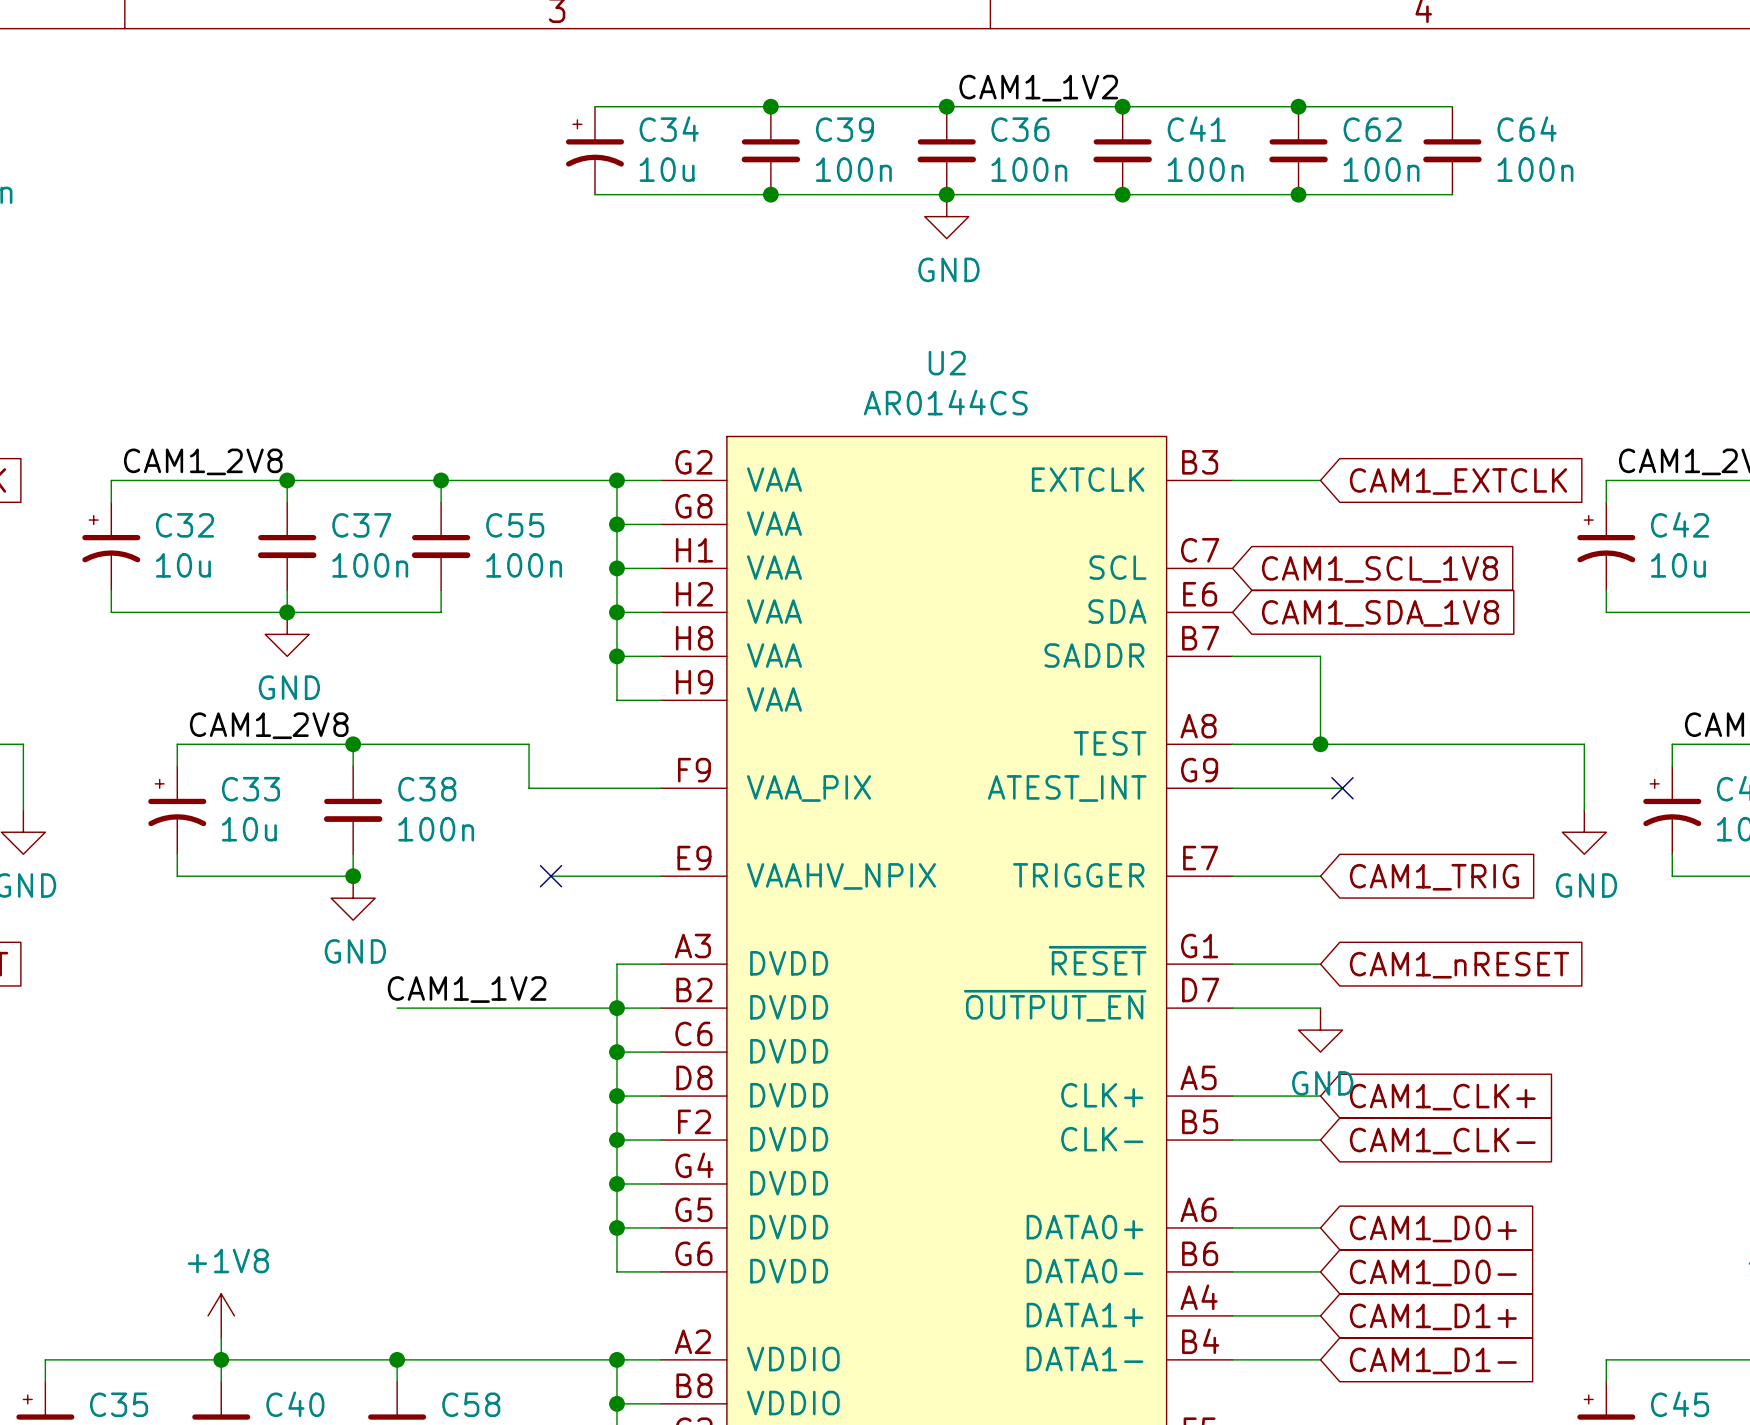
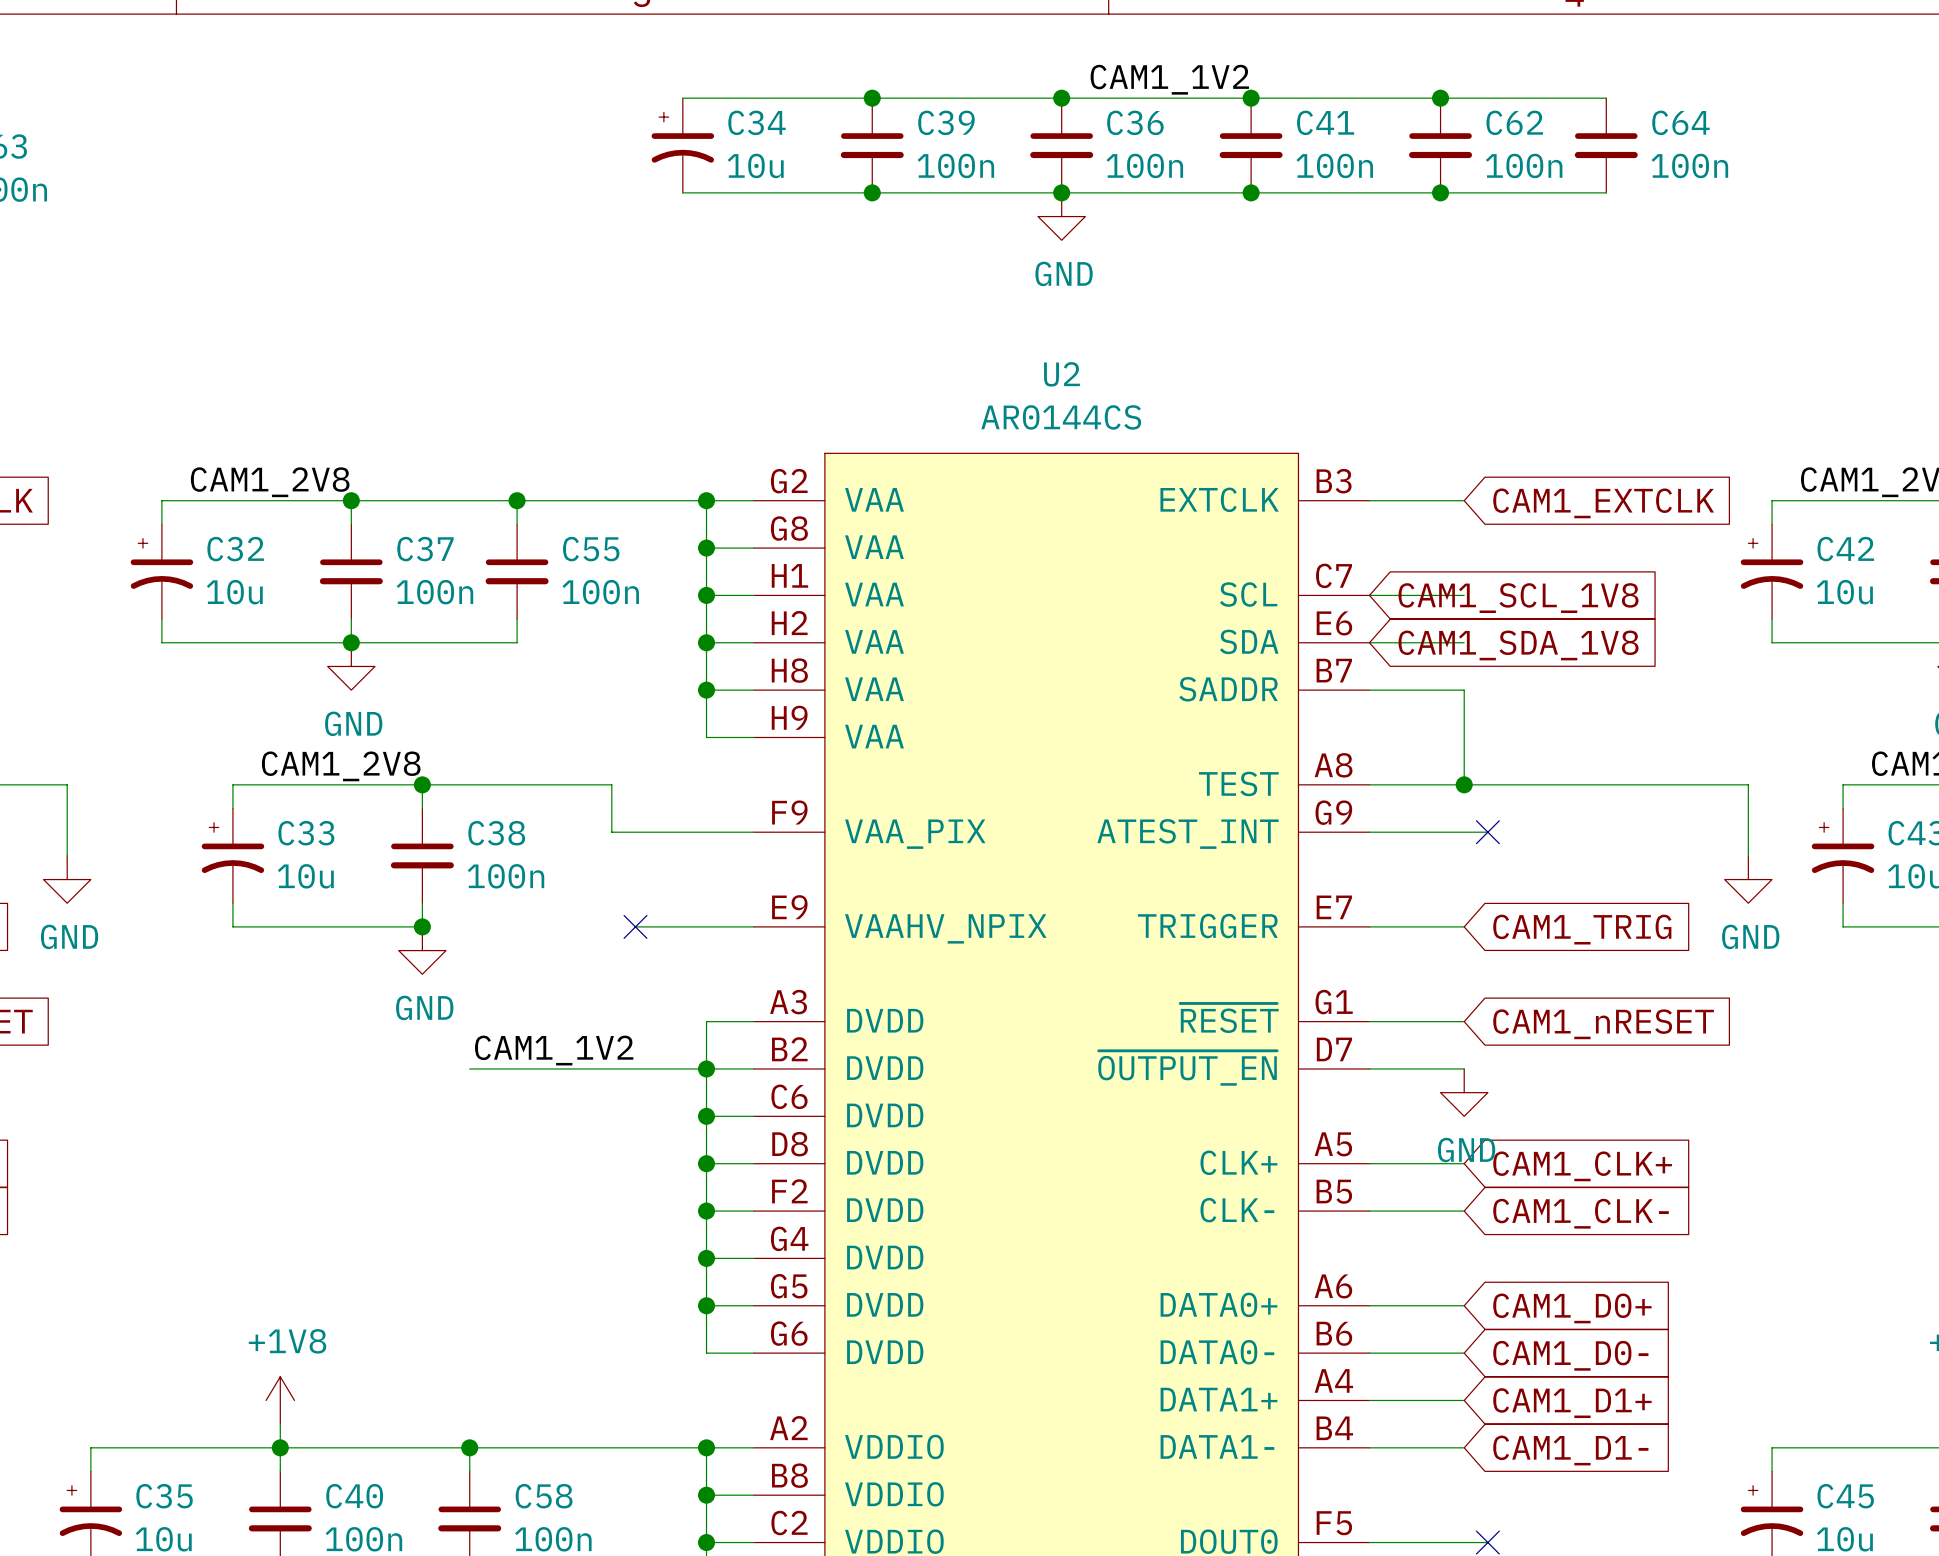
wire: none -> (1369, 595) (1464, 595)
wire: none -> (1369, 642) (1464, 642)

